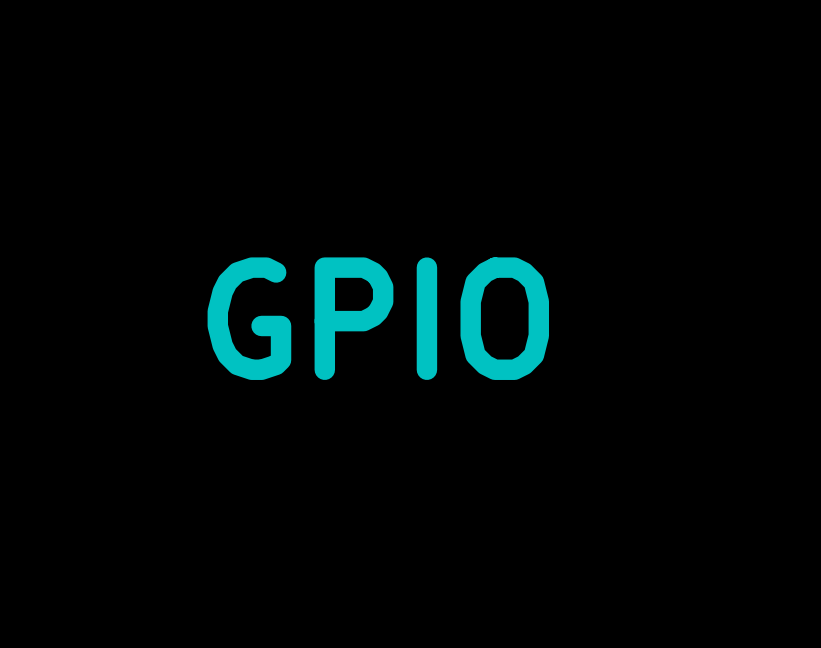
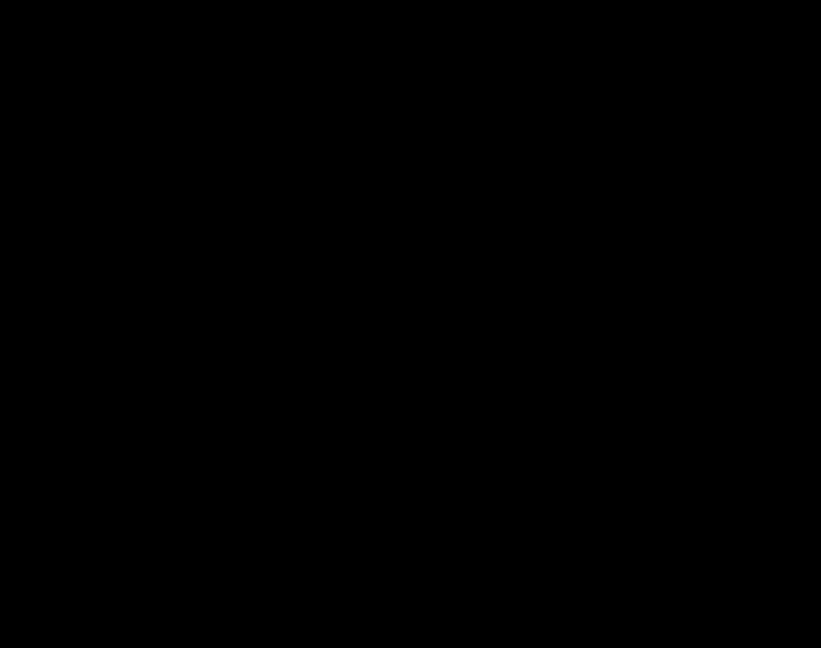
text: GPIO (378, 318) -> none

